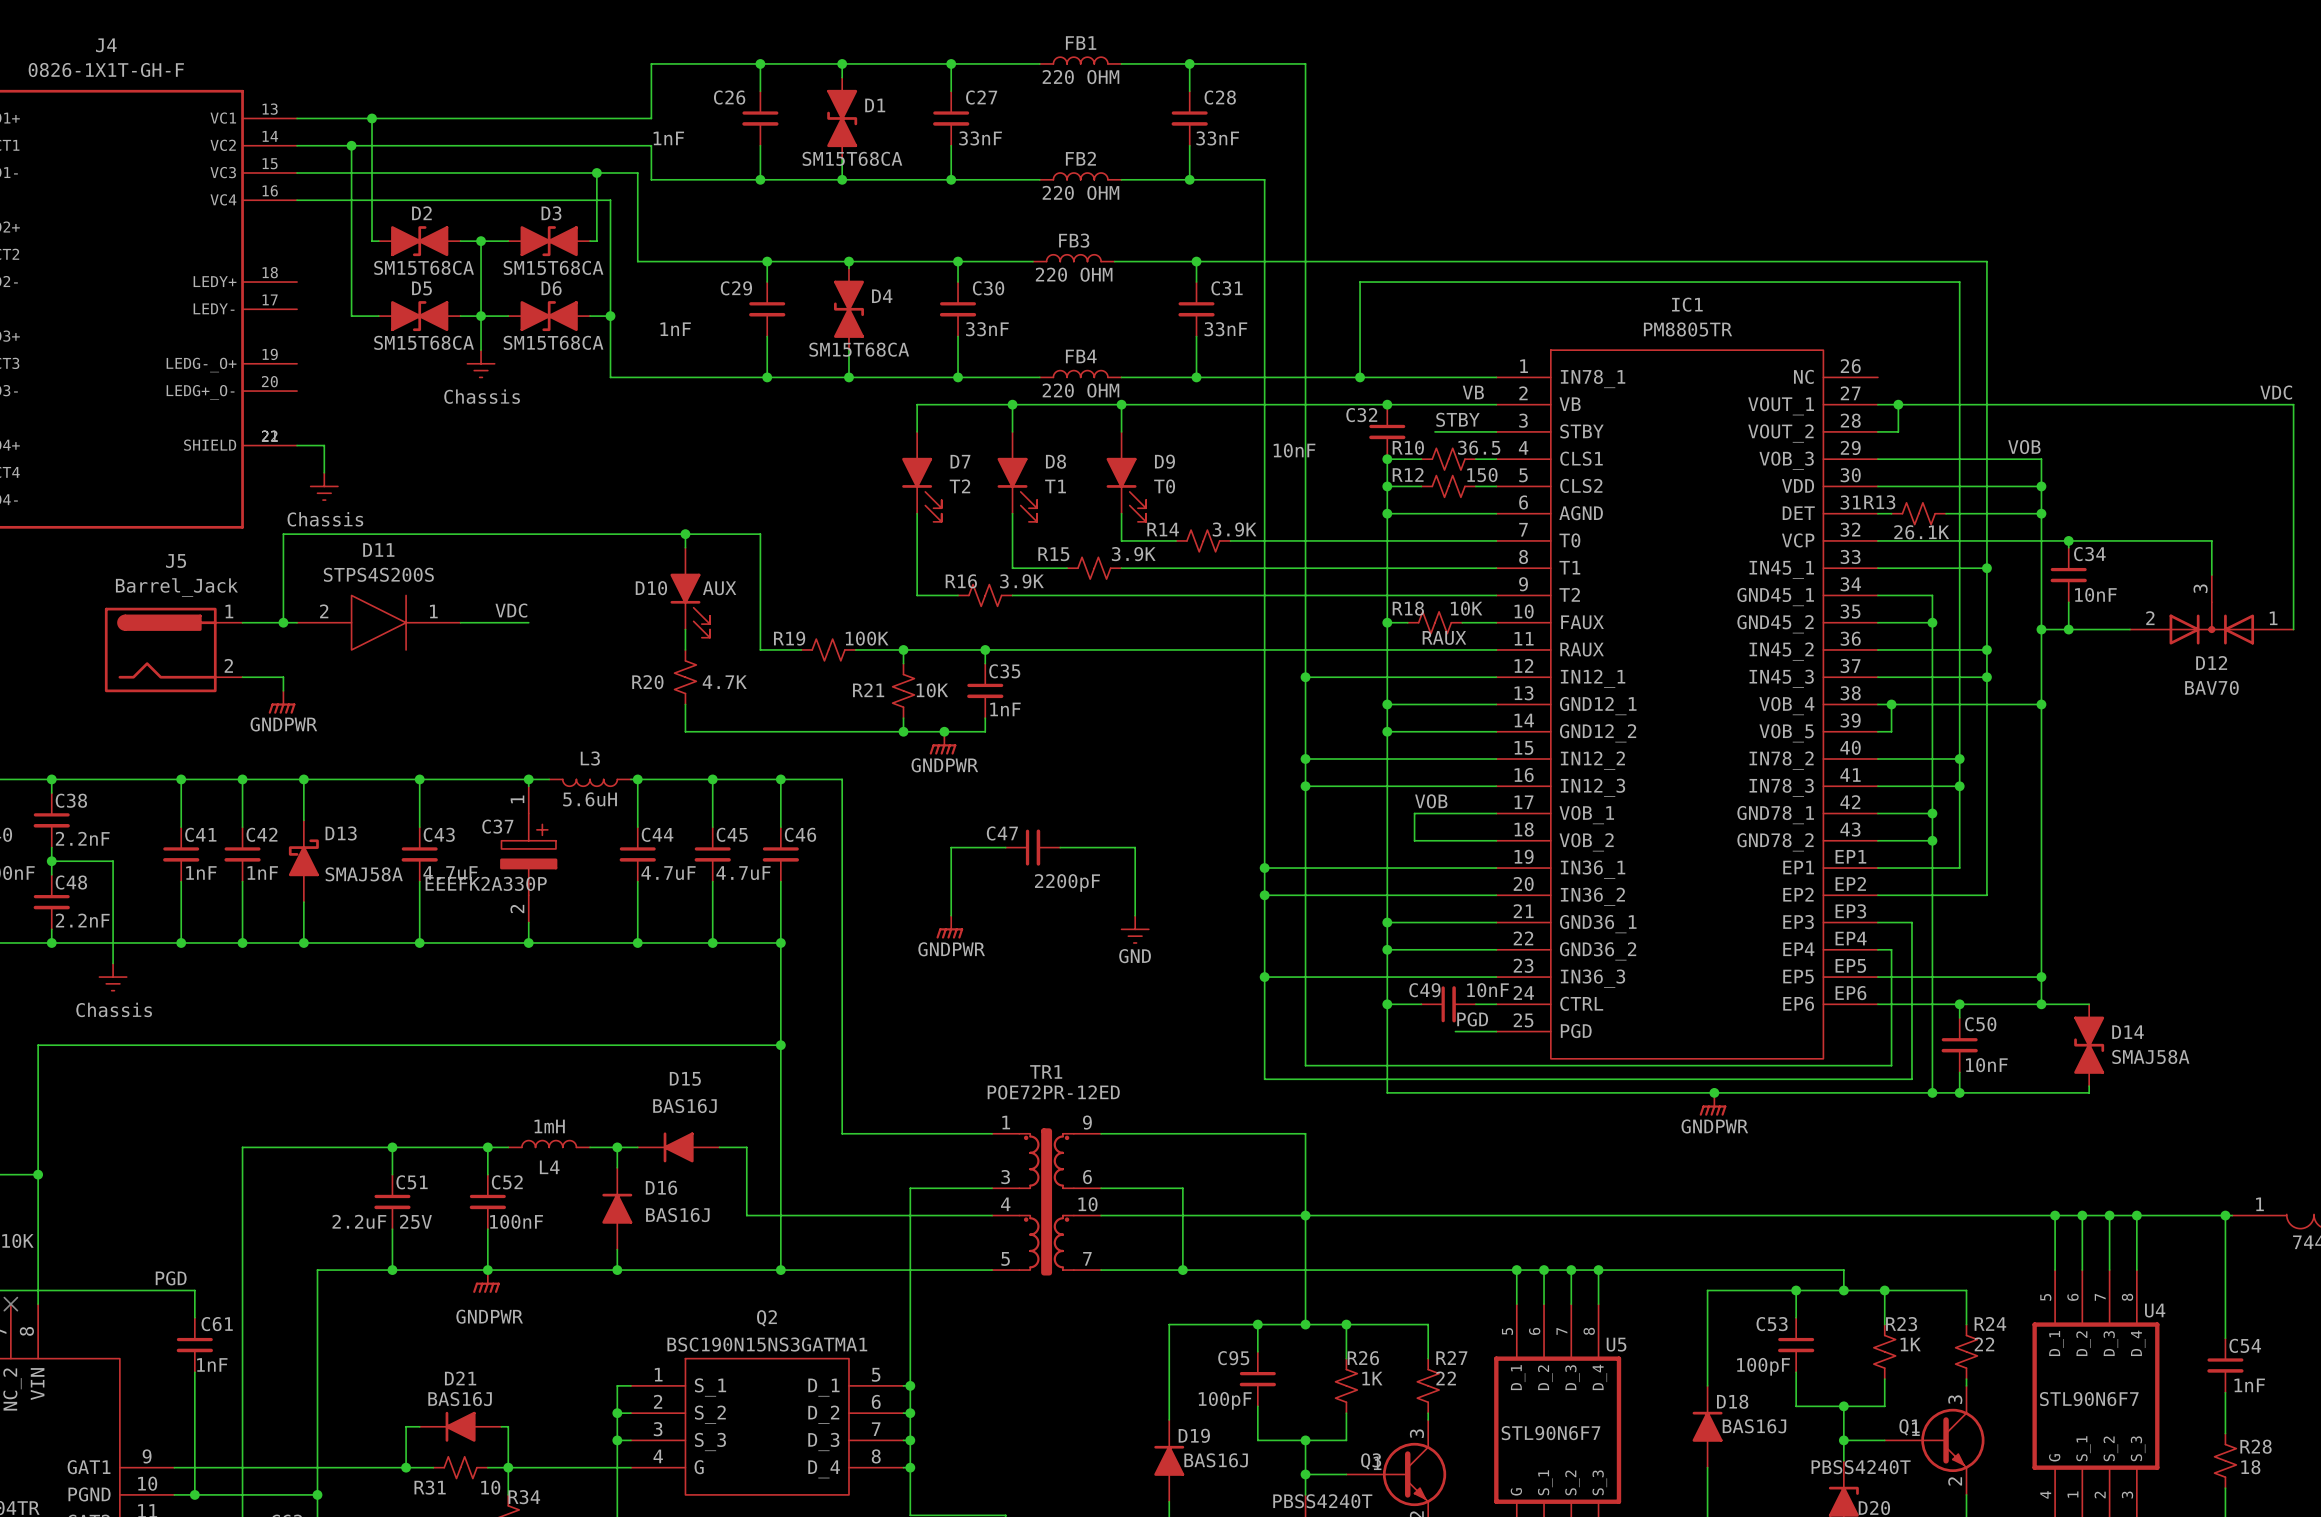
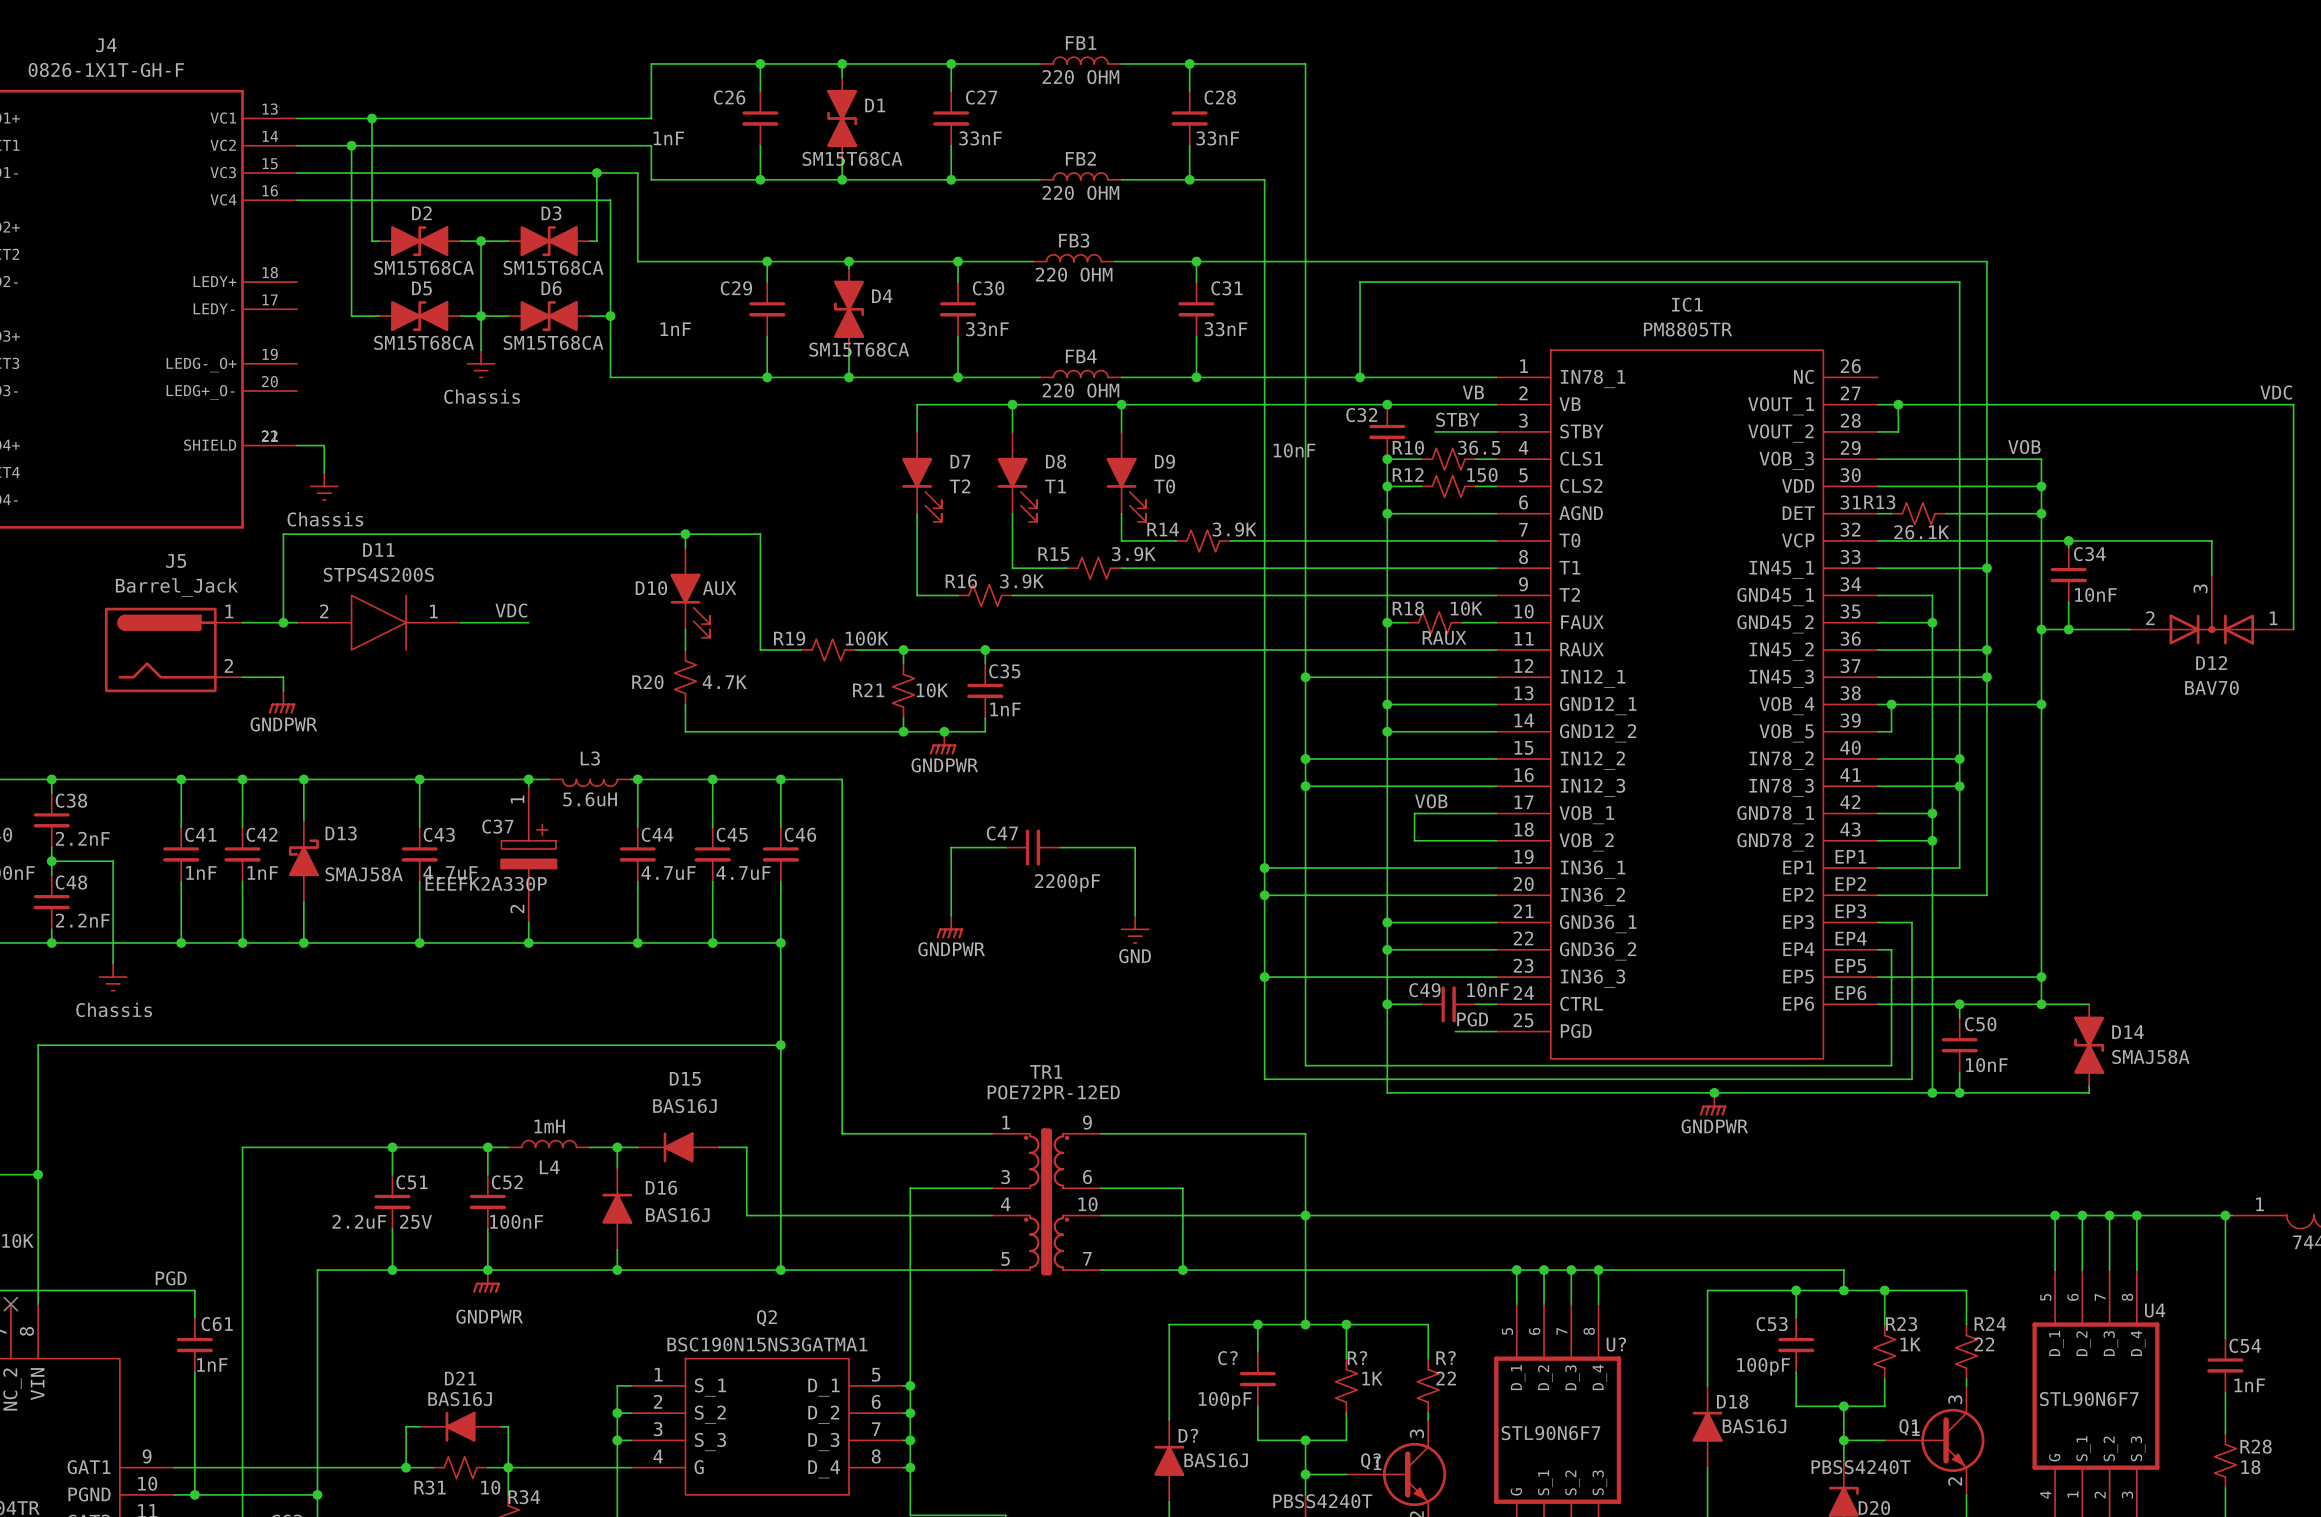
U5 name: U5 (1616, 1344) -> U? (1616, 1344)
C95 name: C95 (1233, 1358) -> C? (1227, 1358)
R26 name: R26 (1363, 1358) -> R? (1357, 1358)
R27 name: R27 (1451, 1358) -> R? (1446, 1358)
D19 name: D19 (1194, 1435) -> D? (1188, 1435)
Q3 name: Q3 (1371, 1461) -> Q? (1370, 1461)

